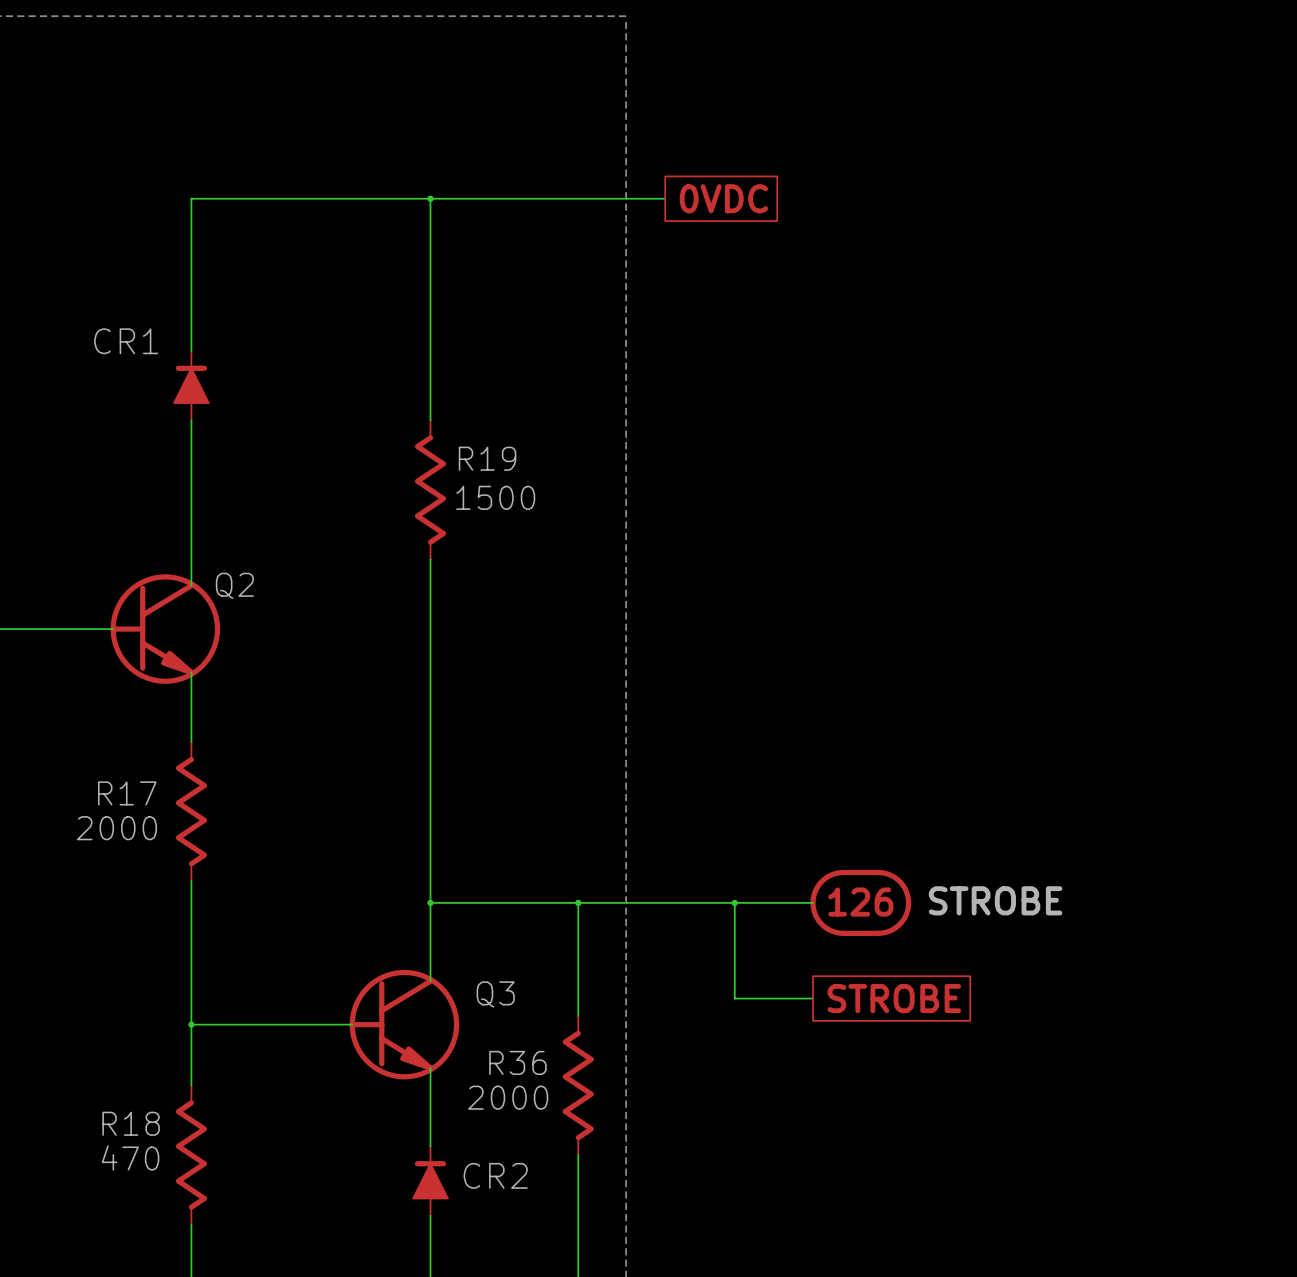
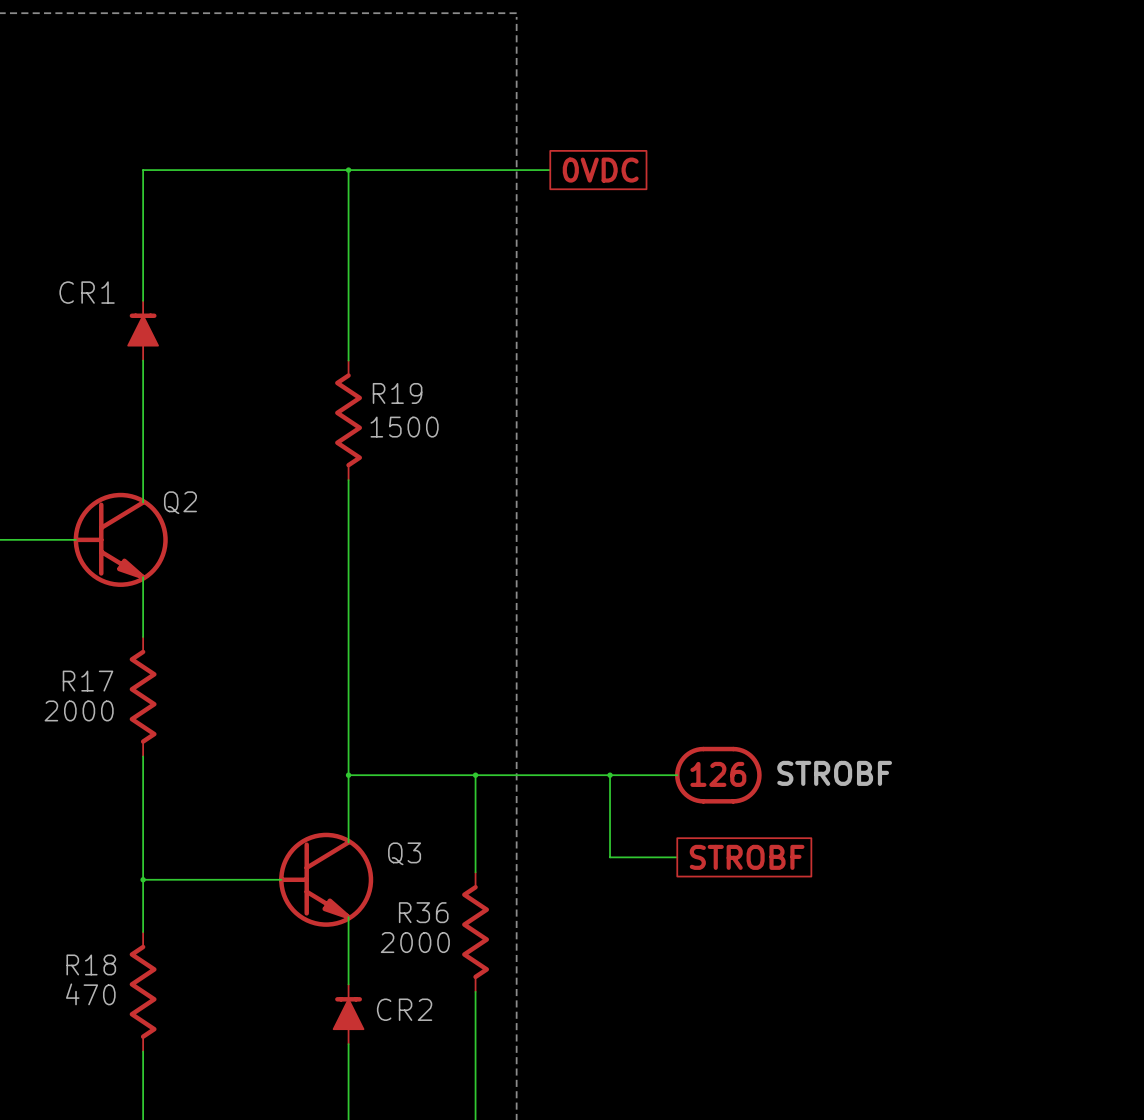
part text: STROBE (995, 900) -> STROBF (834, 773)
global label: STROBE (894, 998) -> STROBF (747, 857)

